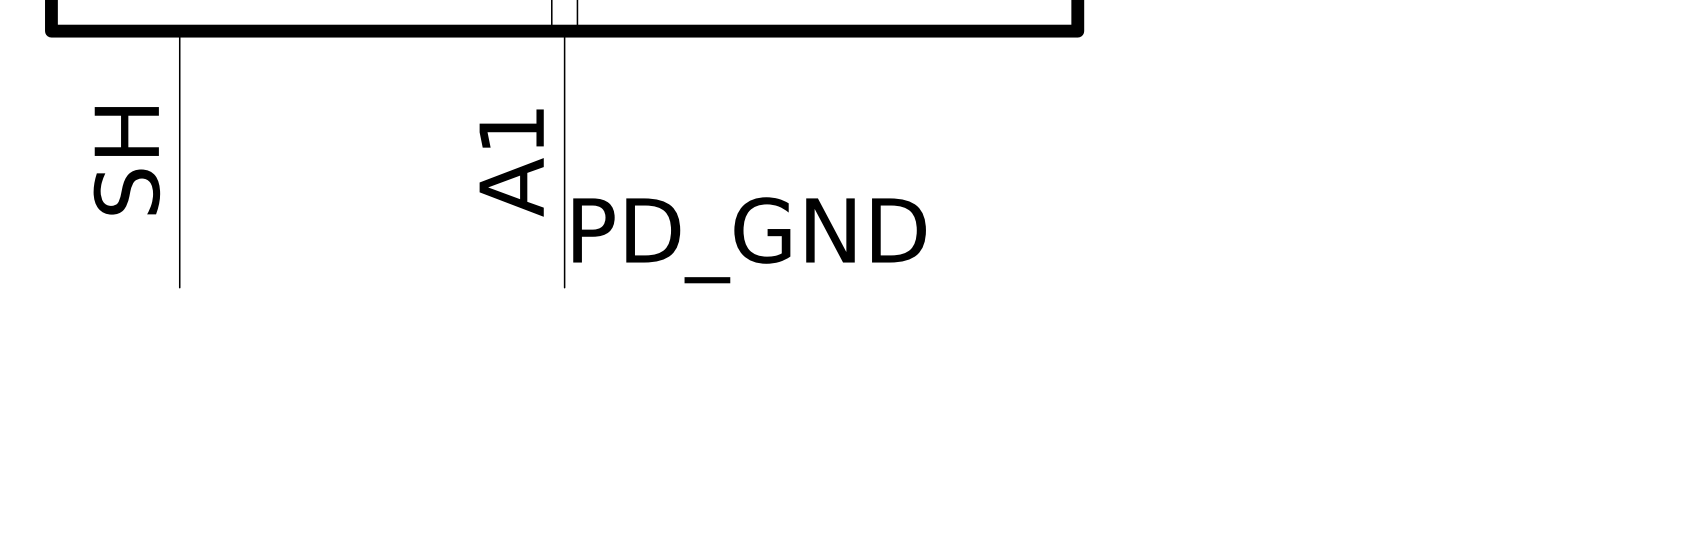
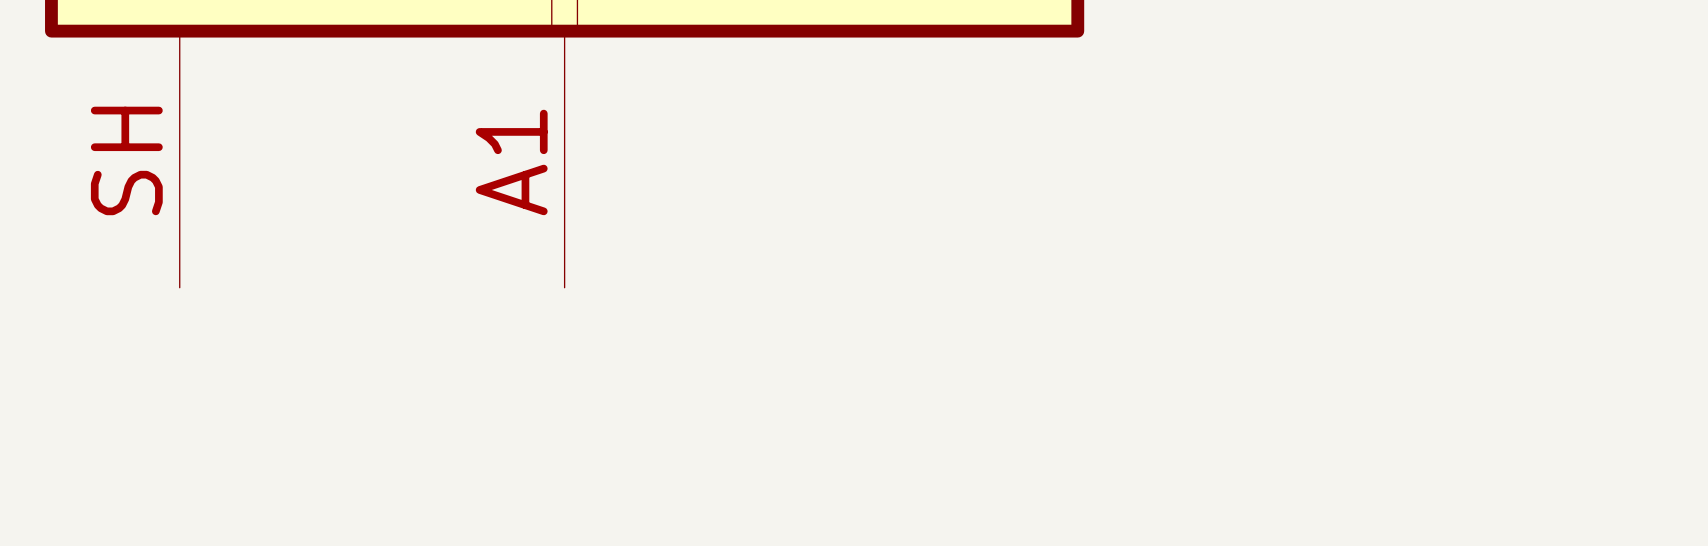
label: PD_GND (749, 240) -> none

